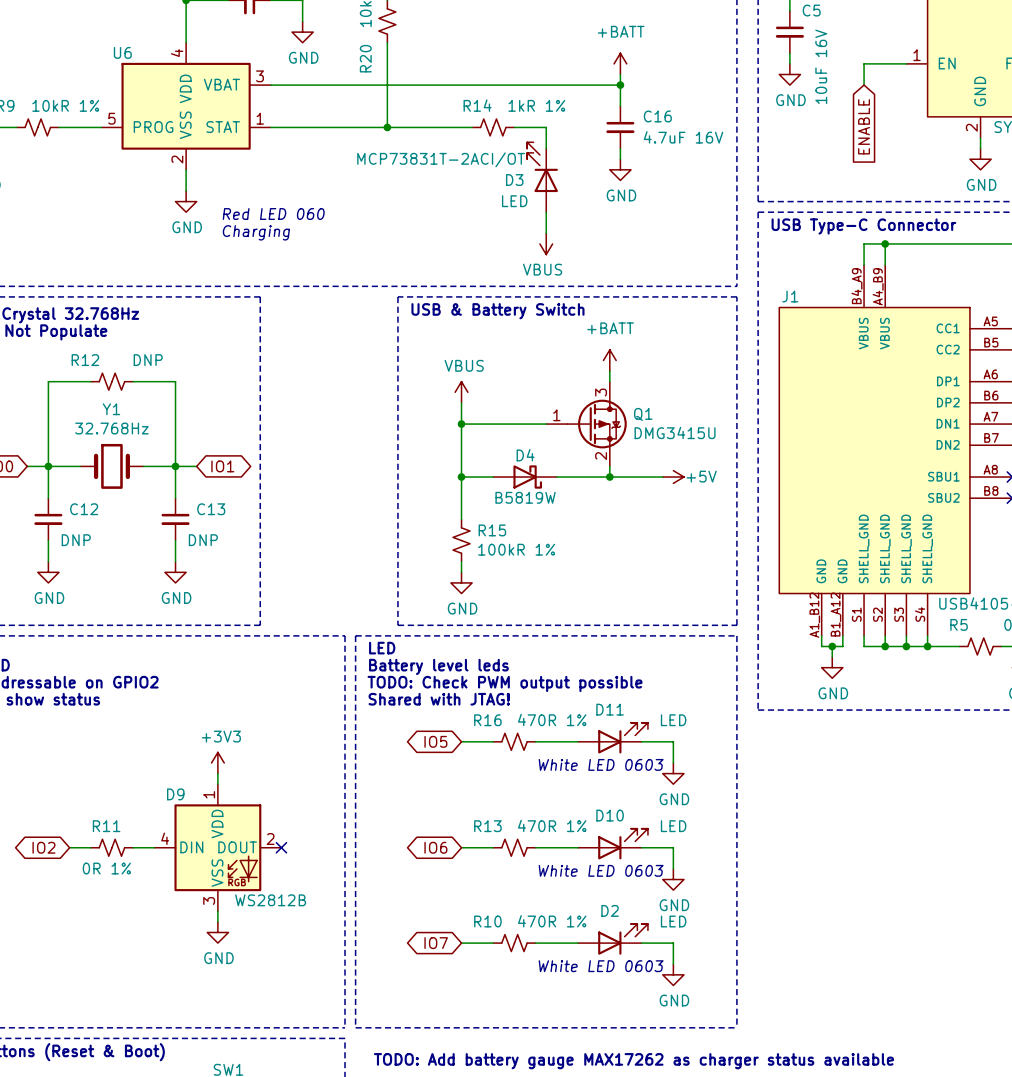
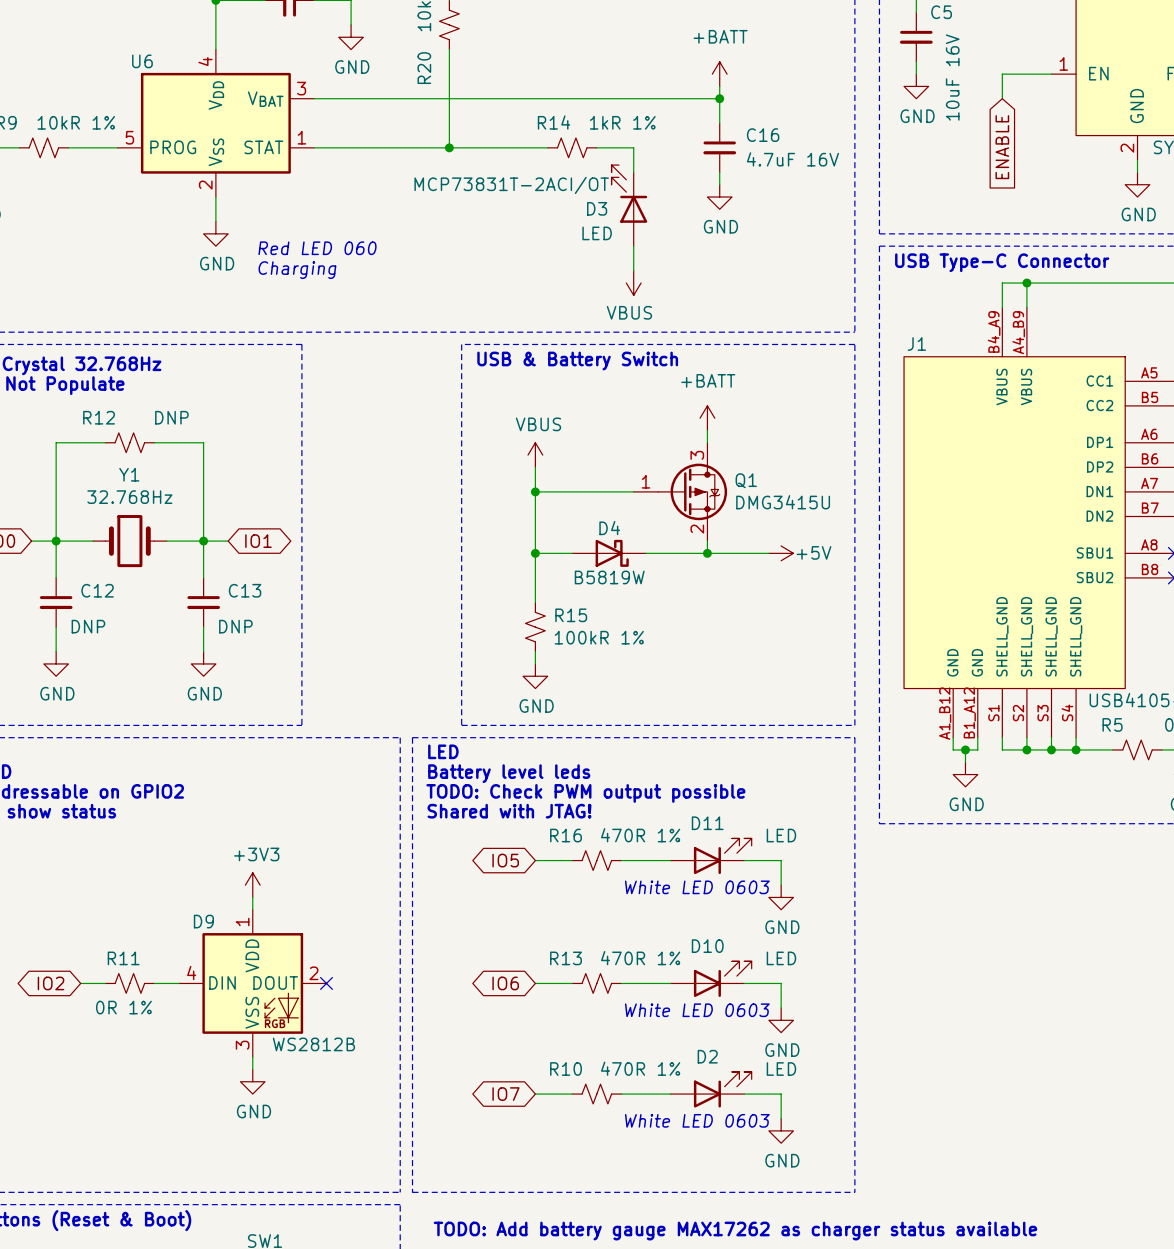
U6 symbol: [101, 42, 271, 170] -> [117, 49, 315, 198]

